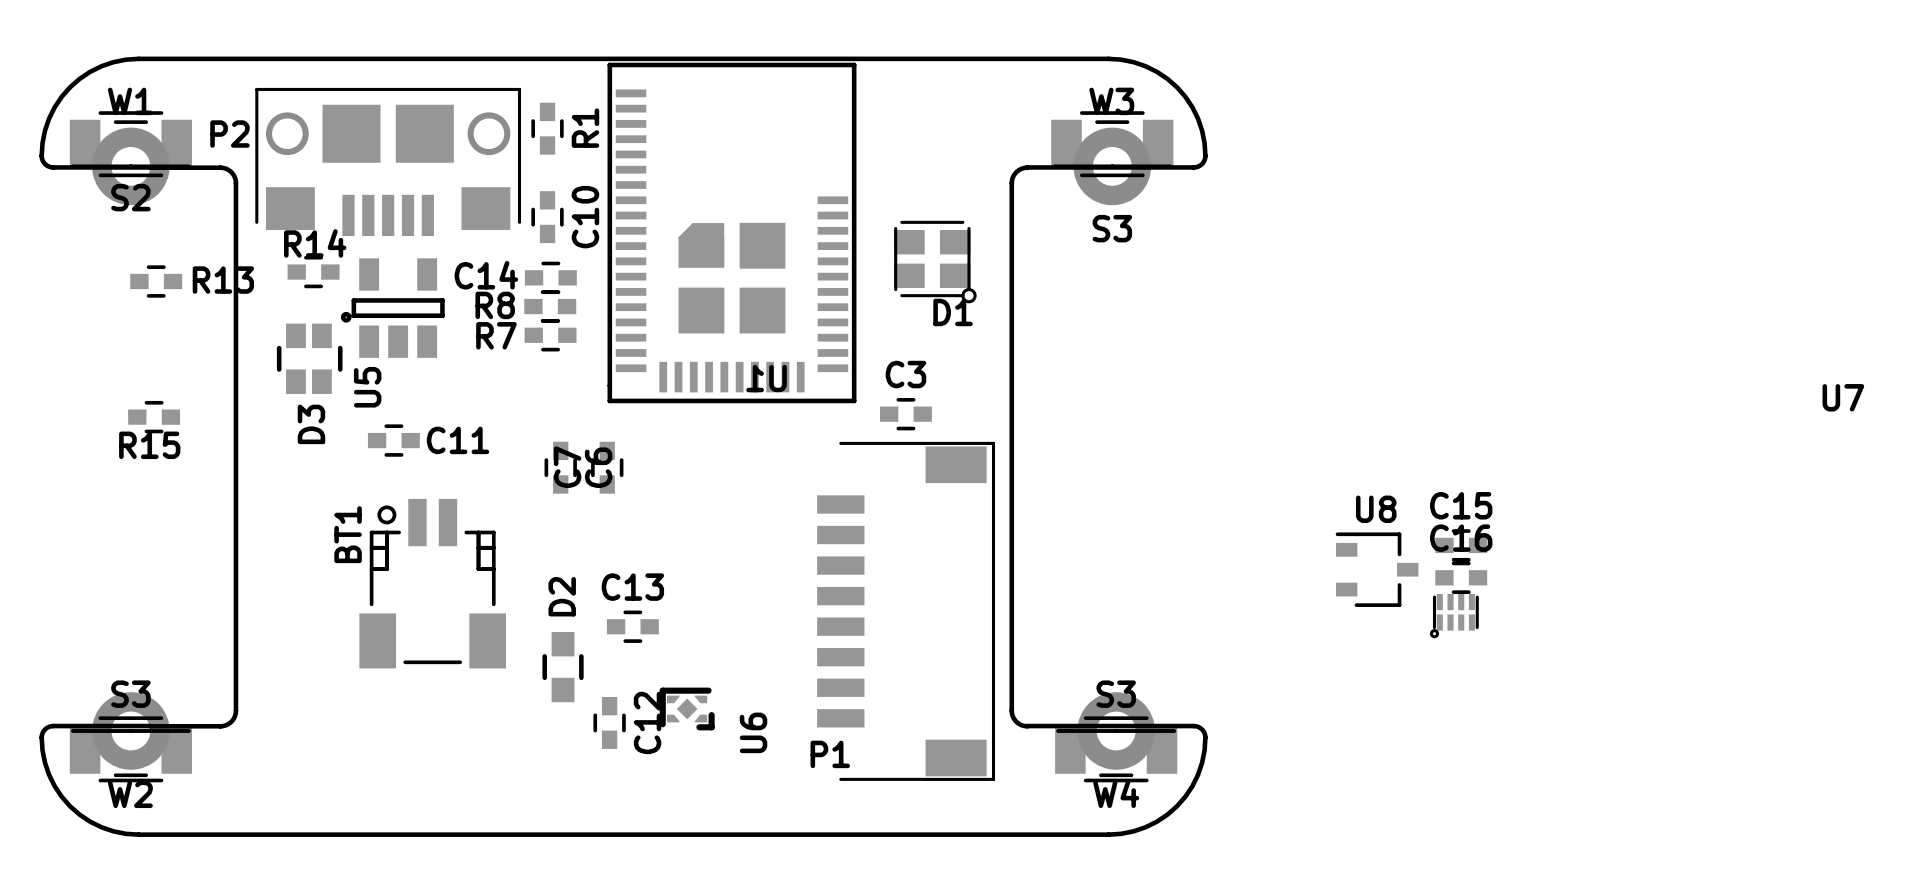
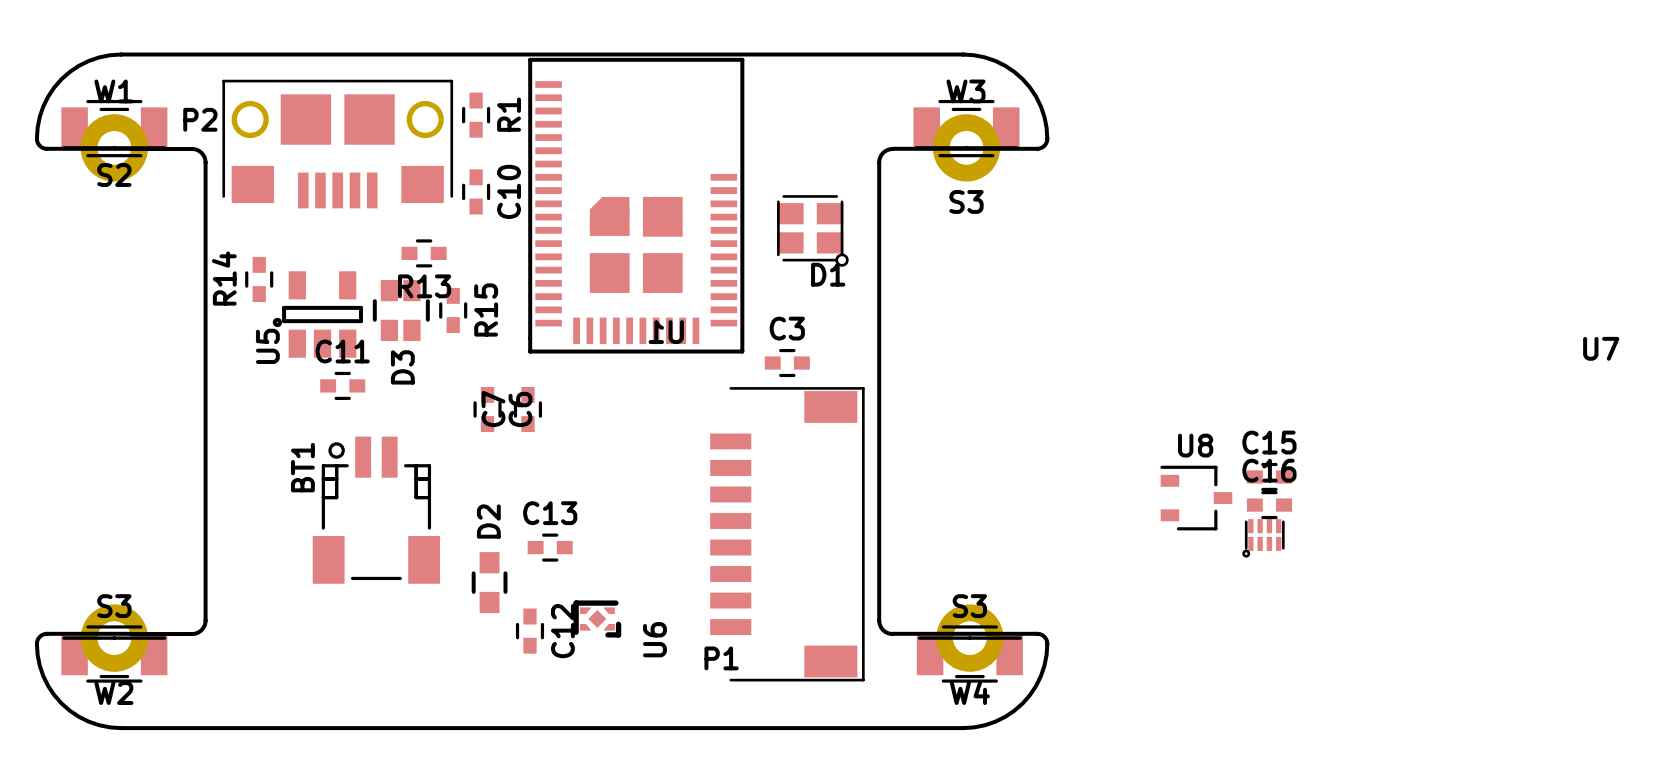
R14 rotation: 0° (313, 272) -> 90° clockwise (259, 279)
R14 position: (313, 272) -> (259, 279)
C14: (550, 277) -> none
R13 name position: R13 (223, 280) -> R13 (424, 286)
R13 position: (156, 281) -> (424, 253)
R8: (550, 306) -> none
U5 position: (392, 308) -> (317, 314)
R7: (550, 335) -> none
D3 position: (309, 358) -> (401, 310)
U5 name position: U5 (367, 387) -> U5 (267, 346)
R15 rotation: 0° (154, 417) -> 90° clockwise (453, 310)
R15 position: (154, 417) -> (453, 310)
C11 name position: C11 (458, 440) -> C11 (342, 351)

